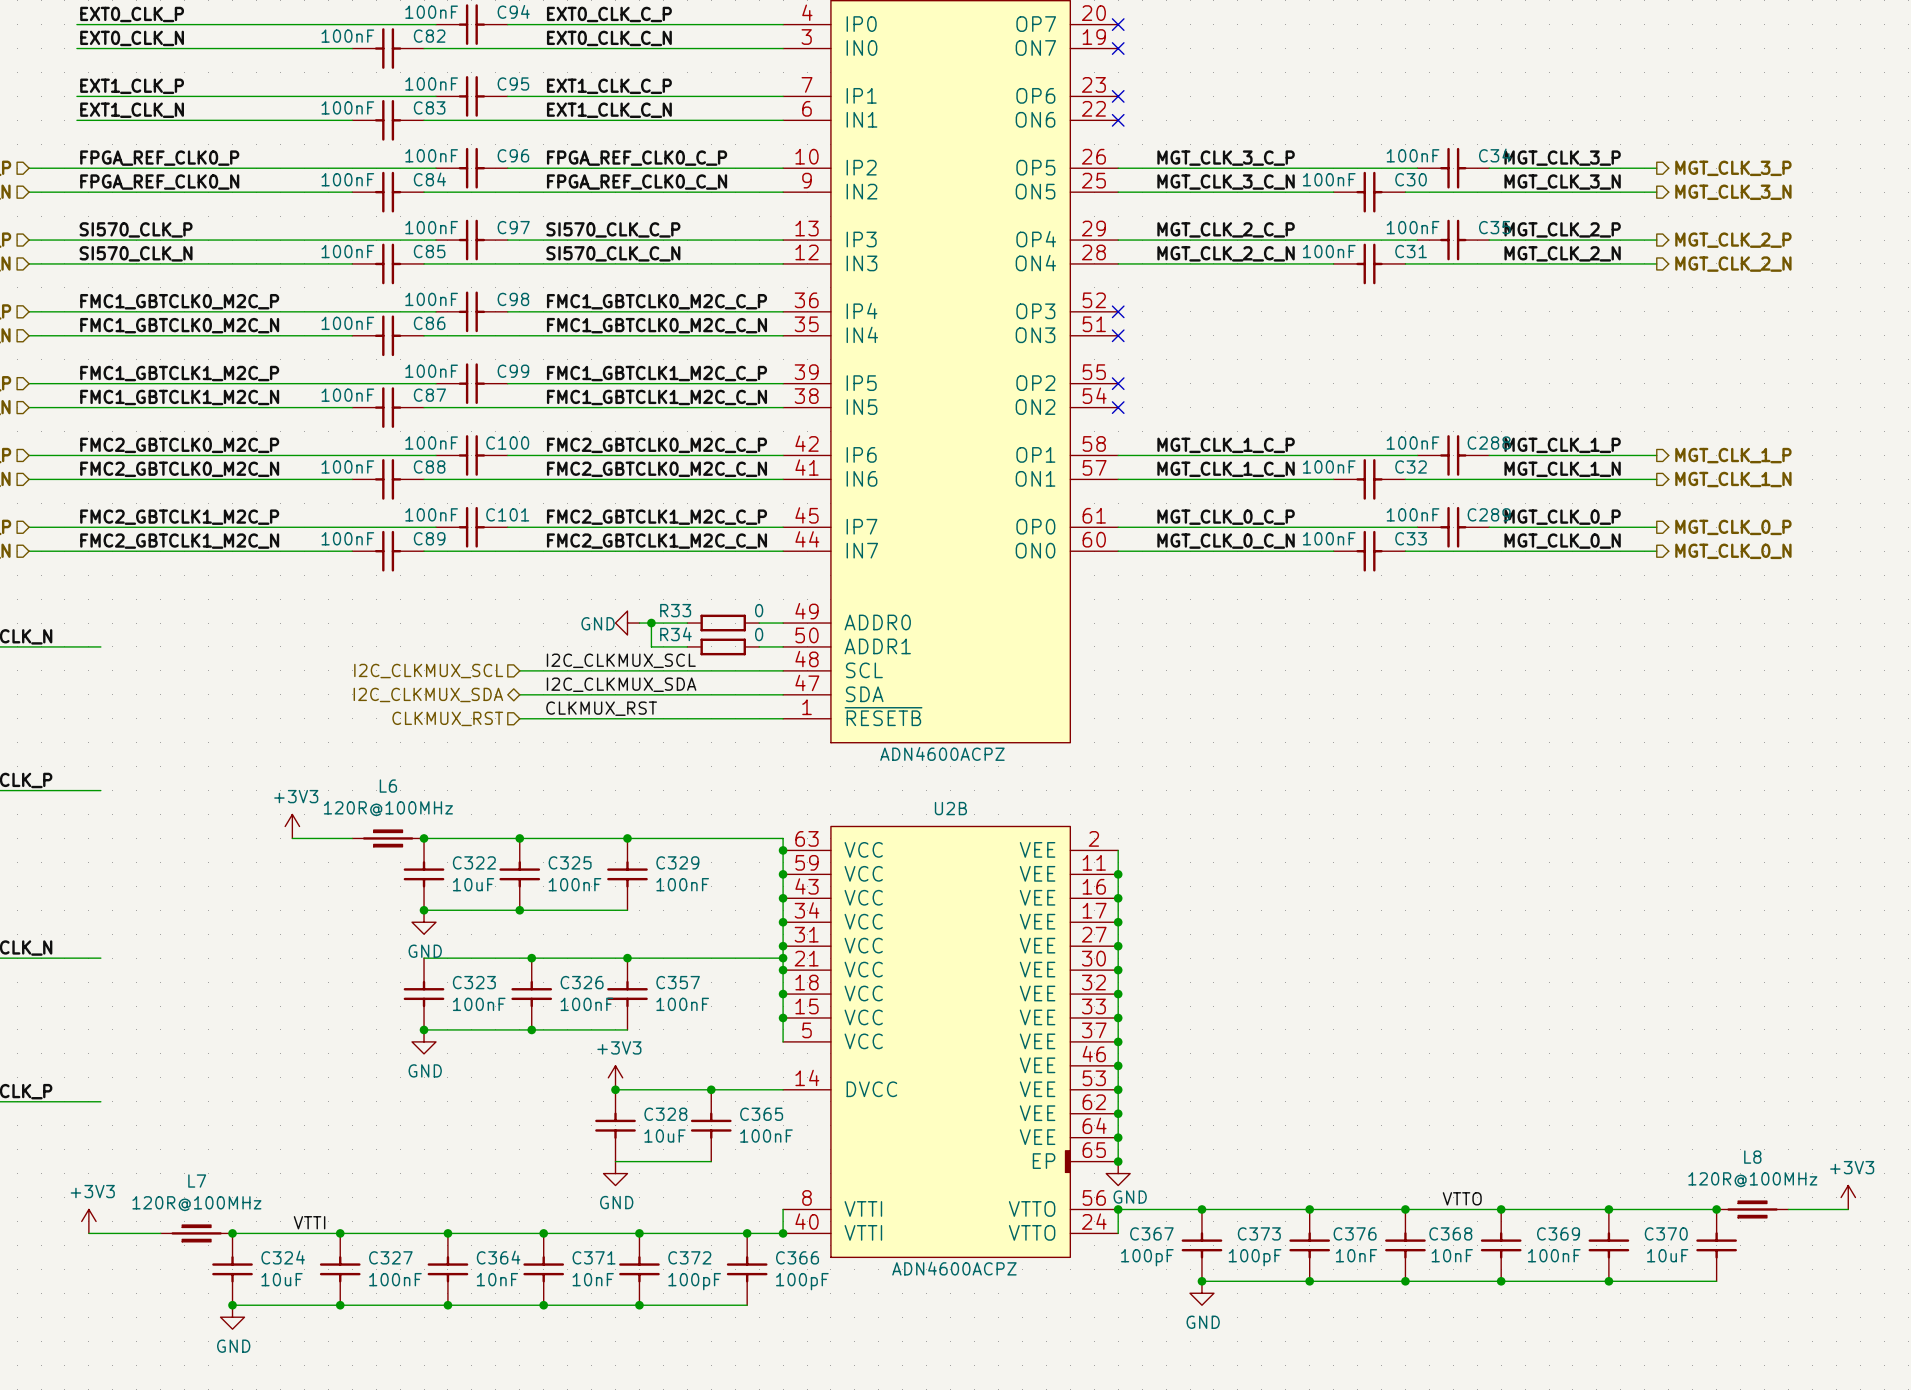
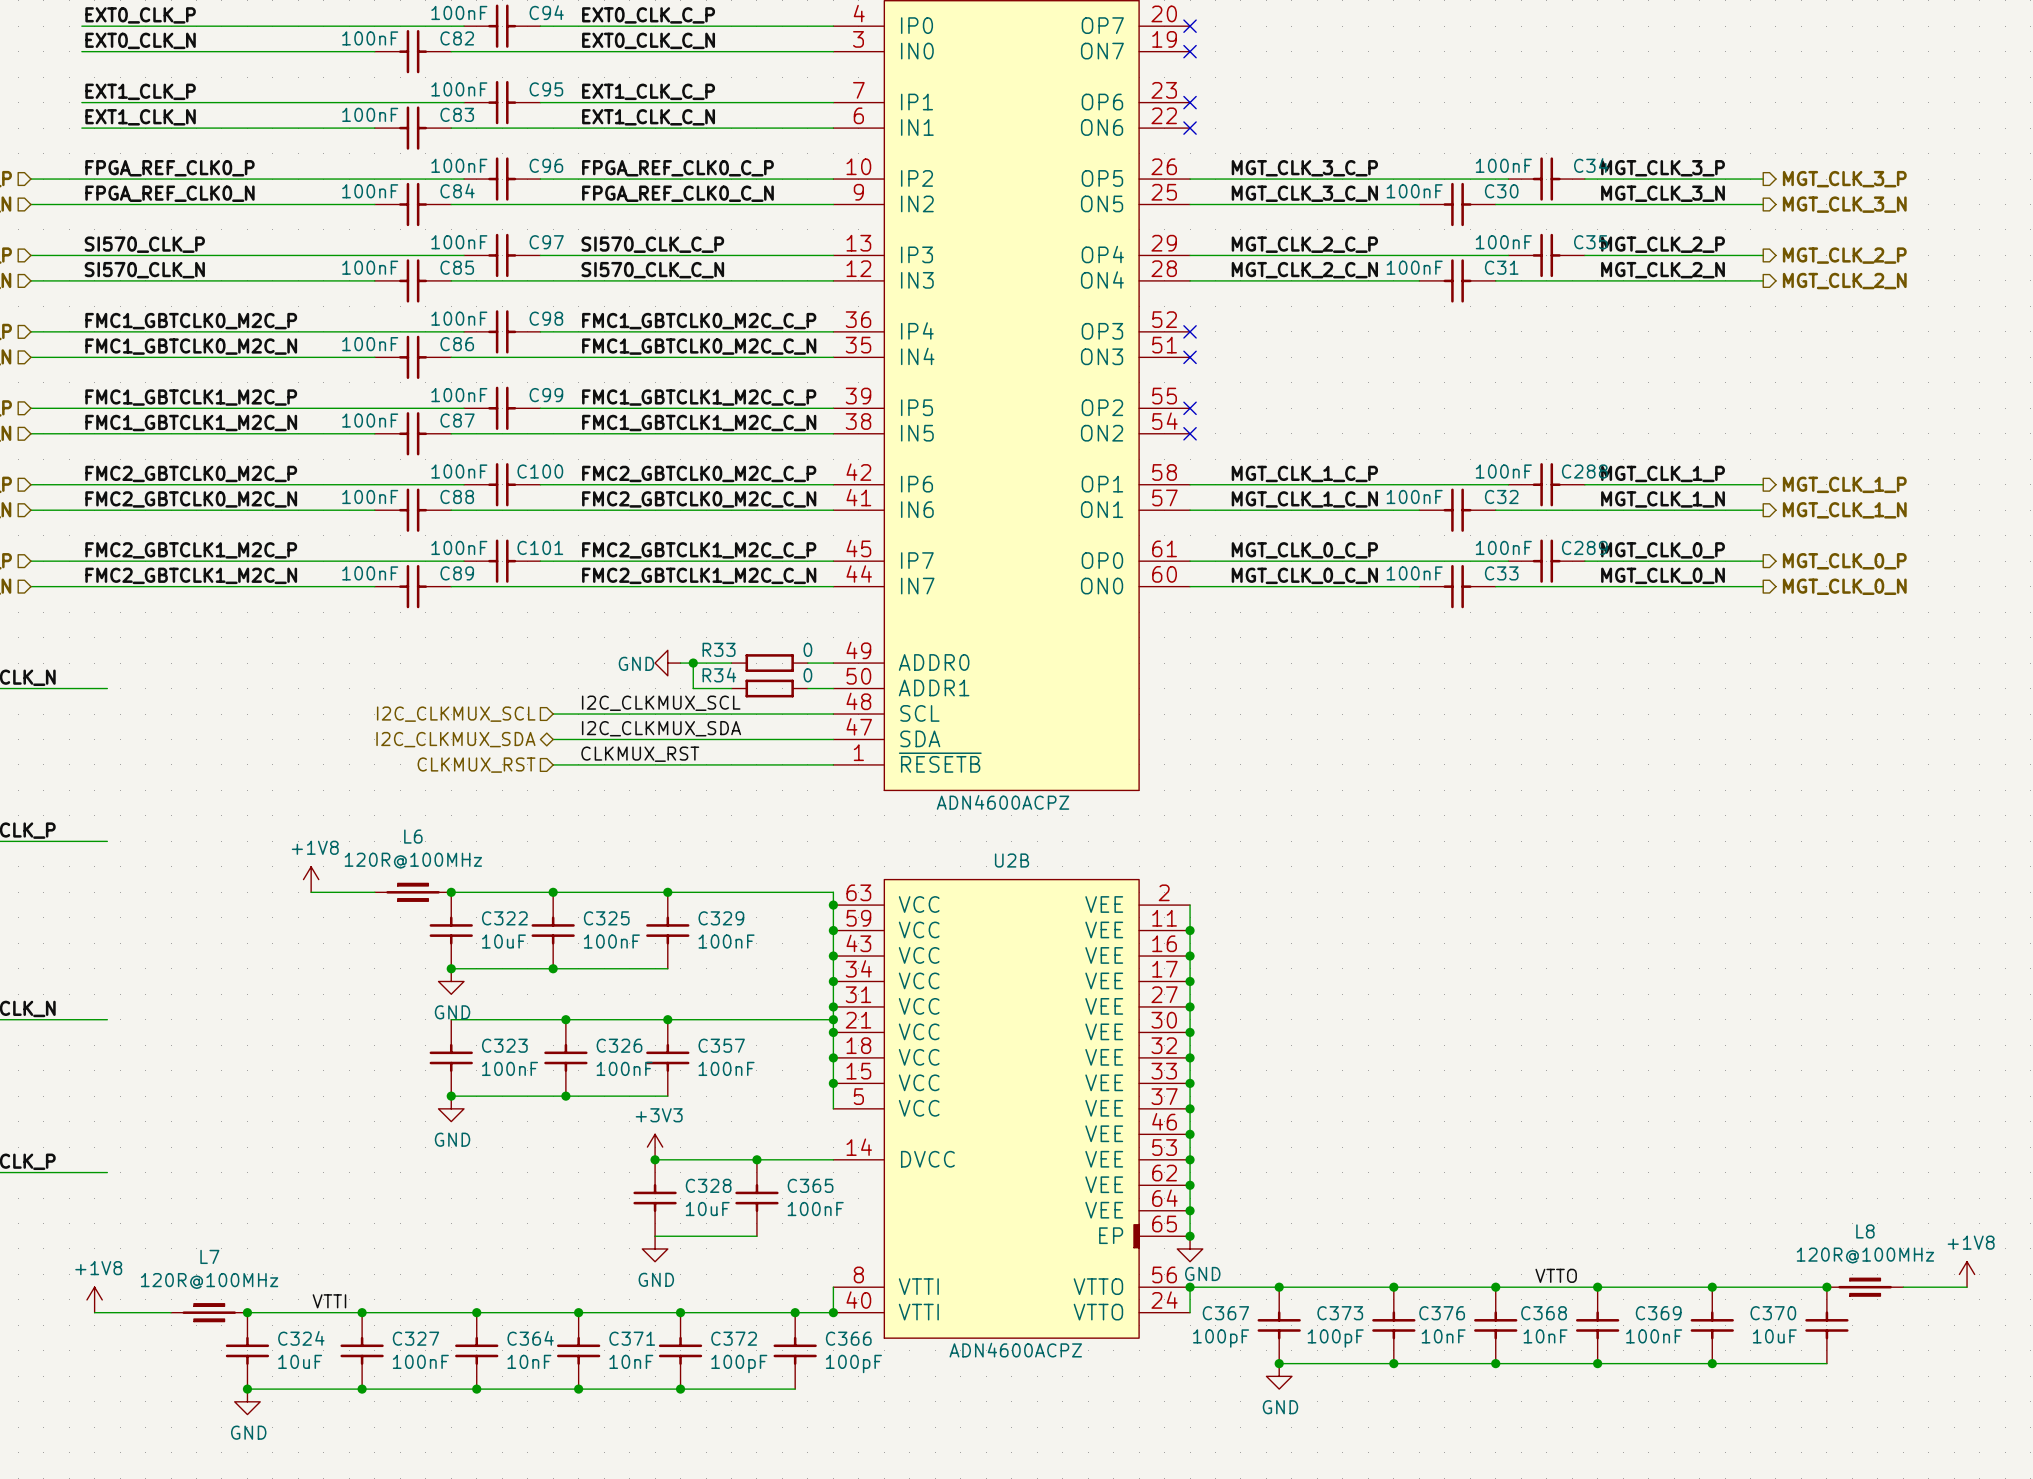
power symbol: +3V3 (292, 826) -> +1V8 (311, 879)
power symbol: +3V3 (1848, 1197) -> +1V8 (1967, 1274)
power symbol: +3V3 (88, 1221) -> +1V8 (94, 1299)

